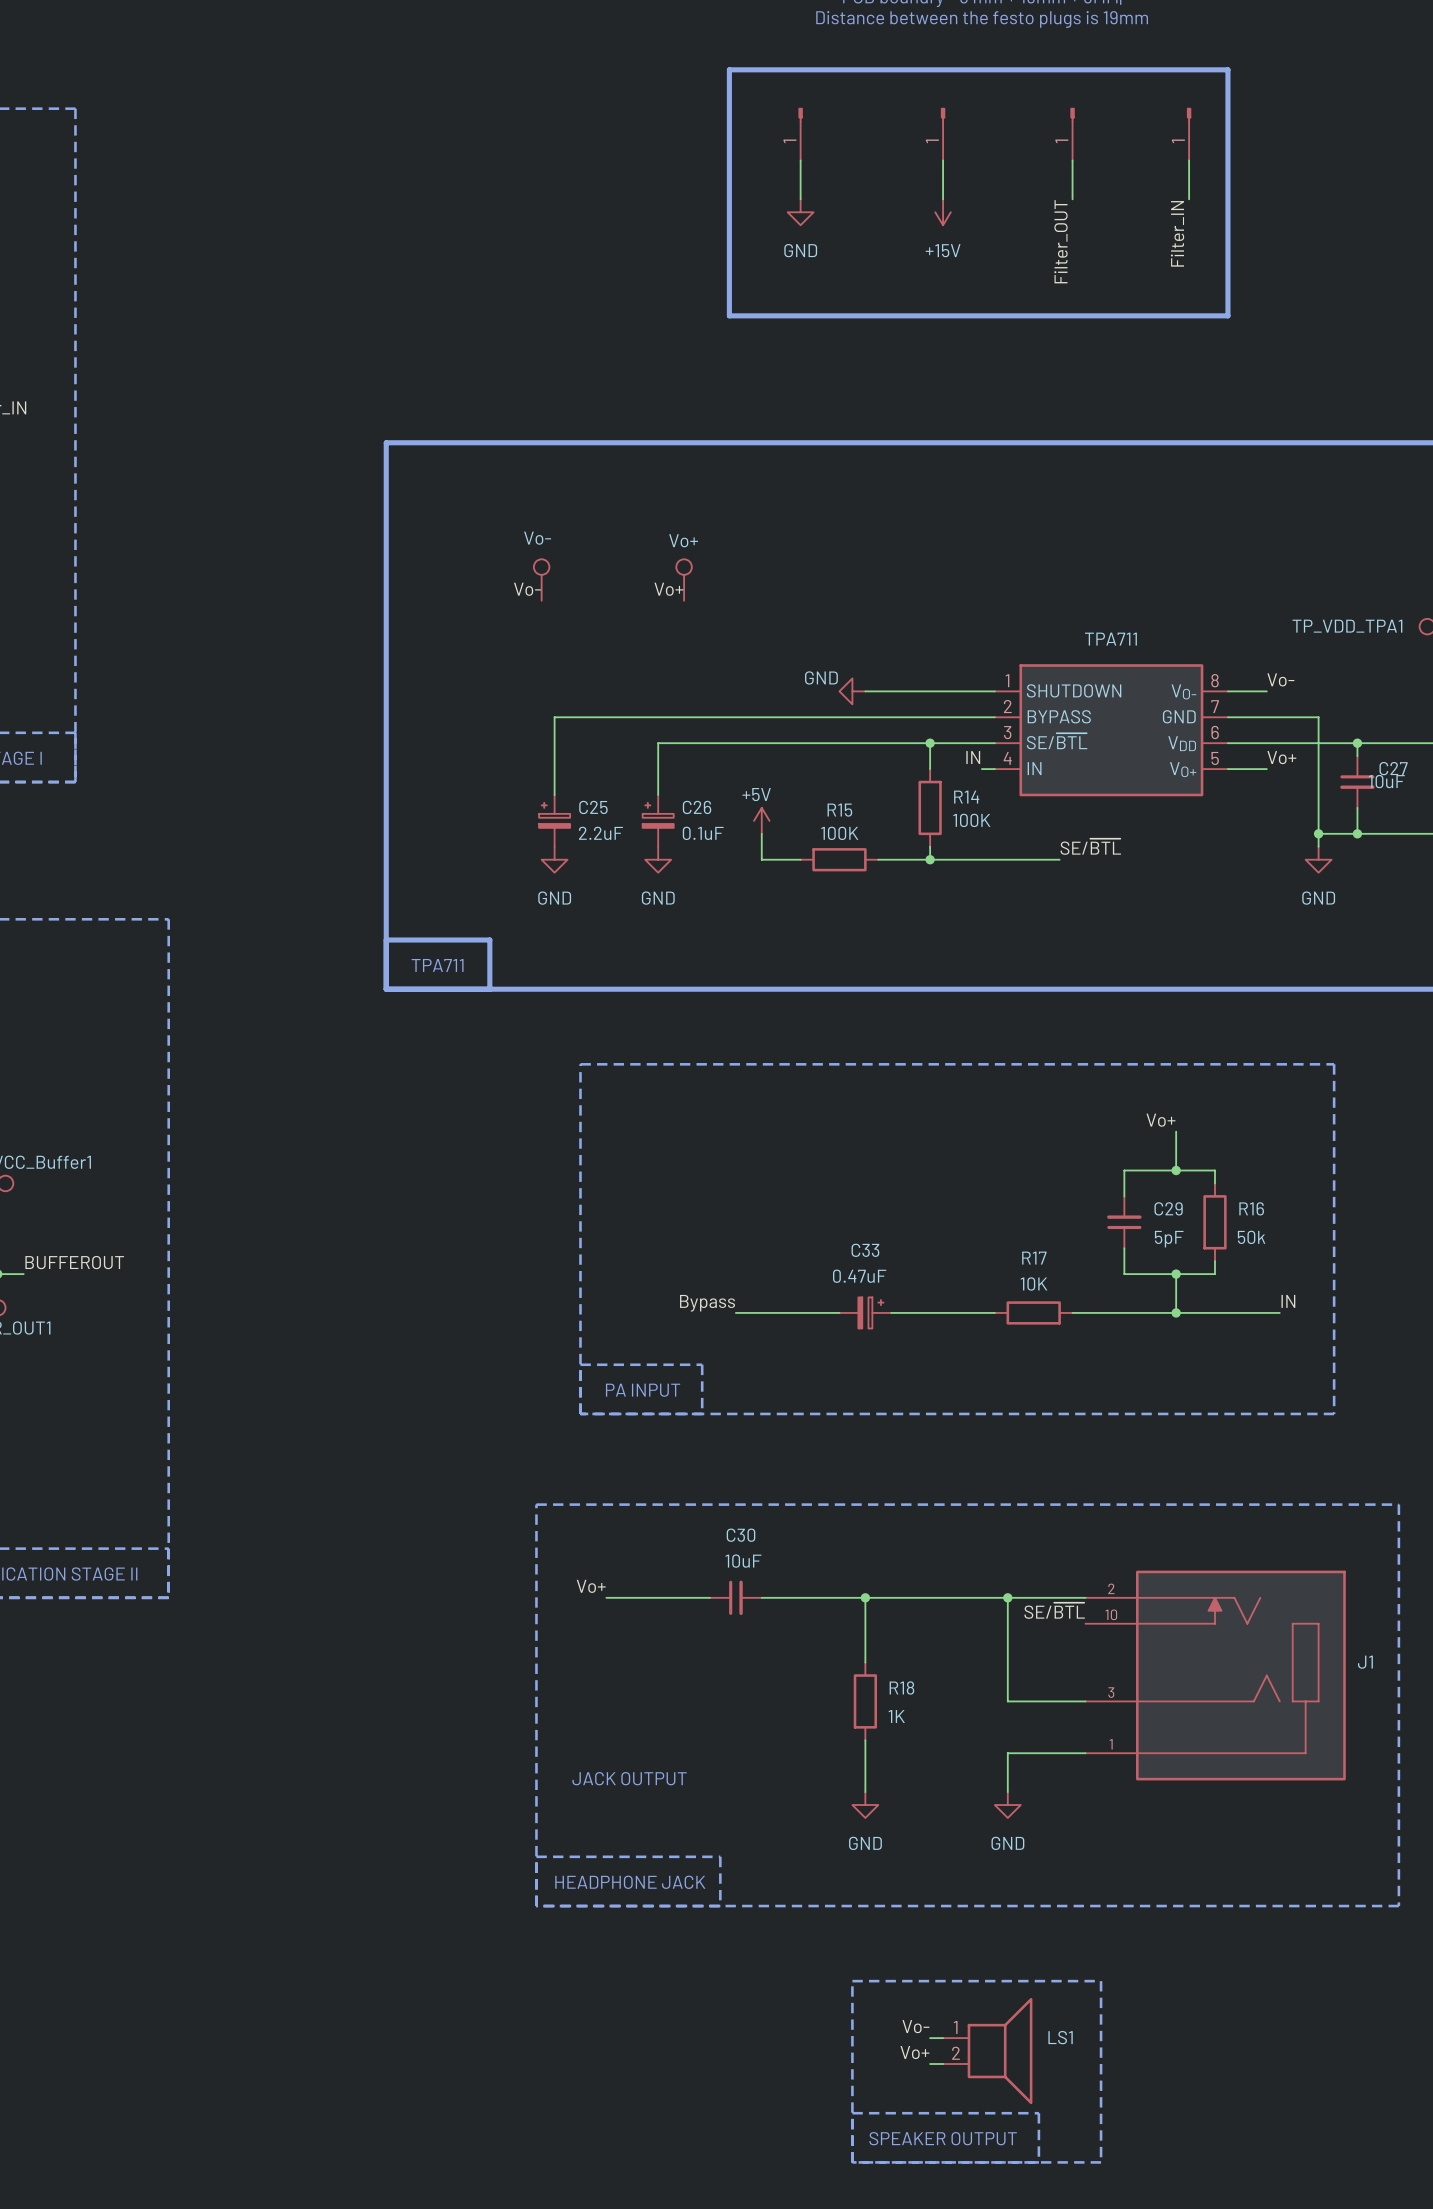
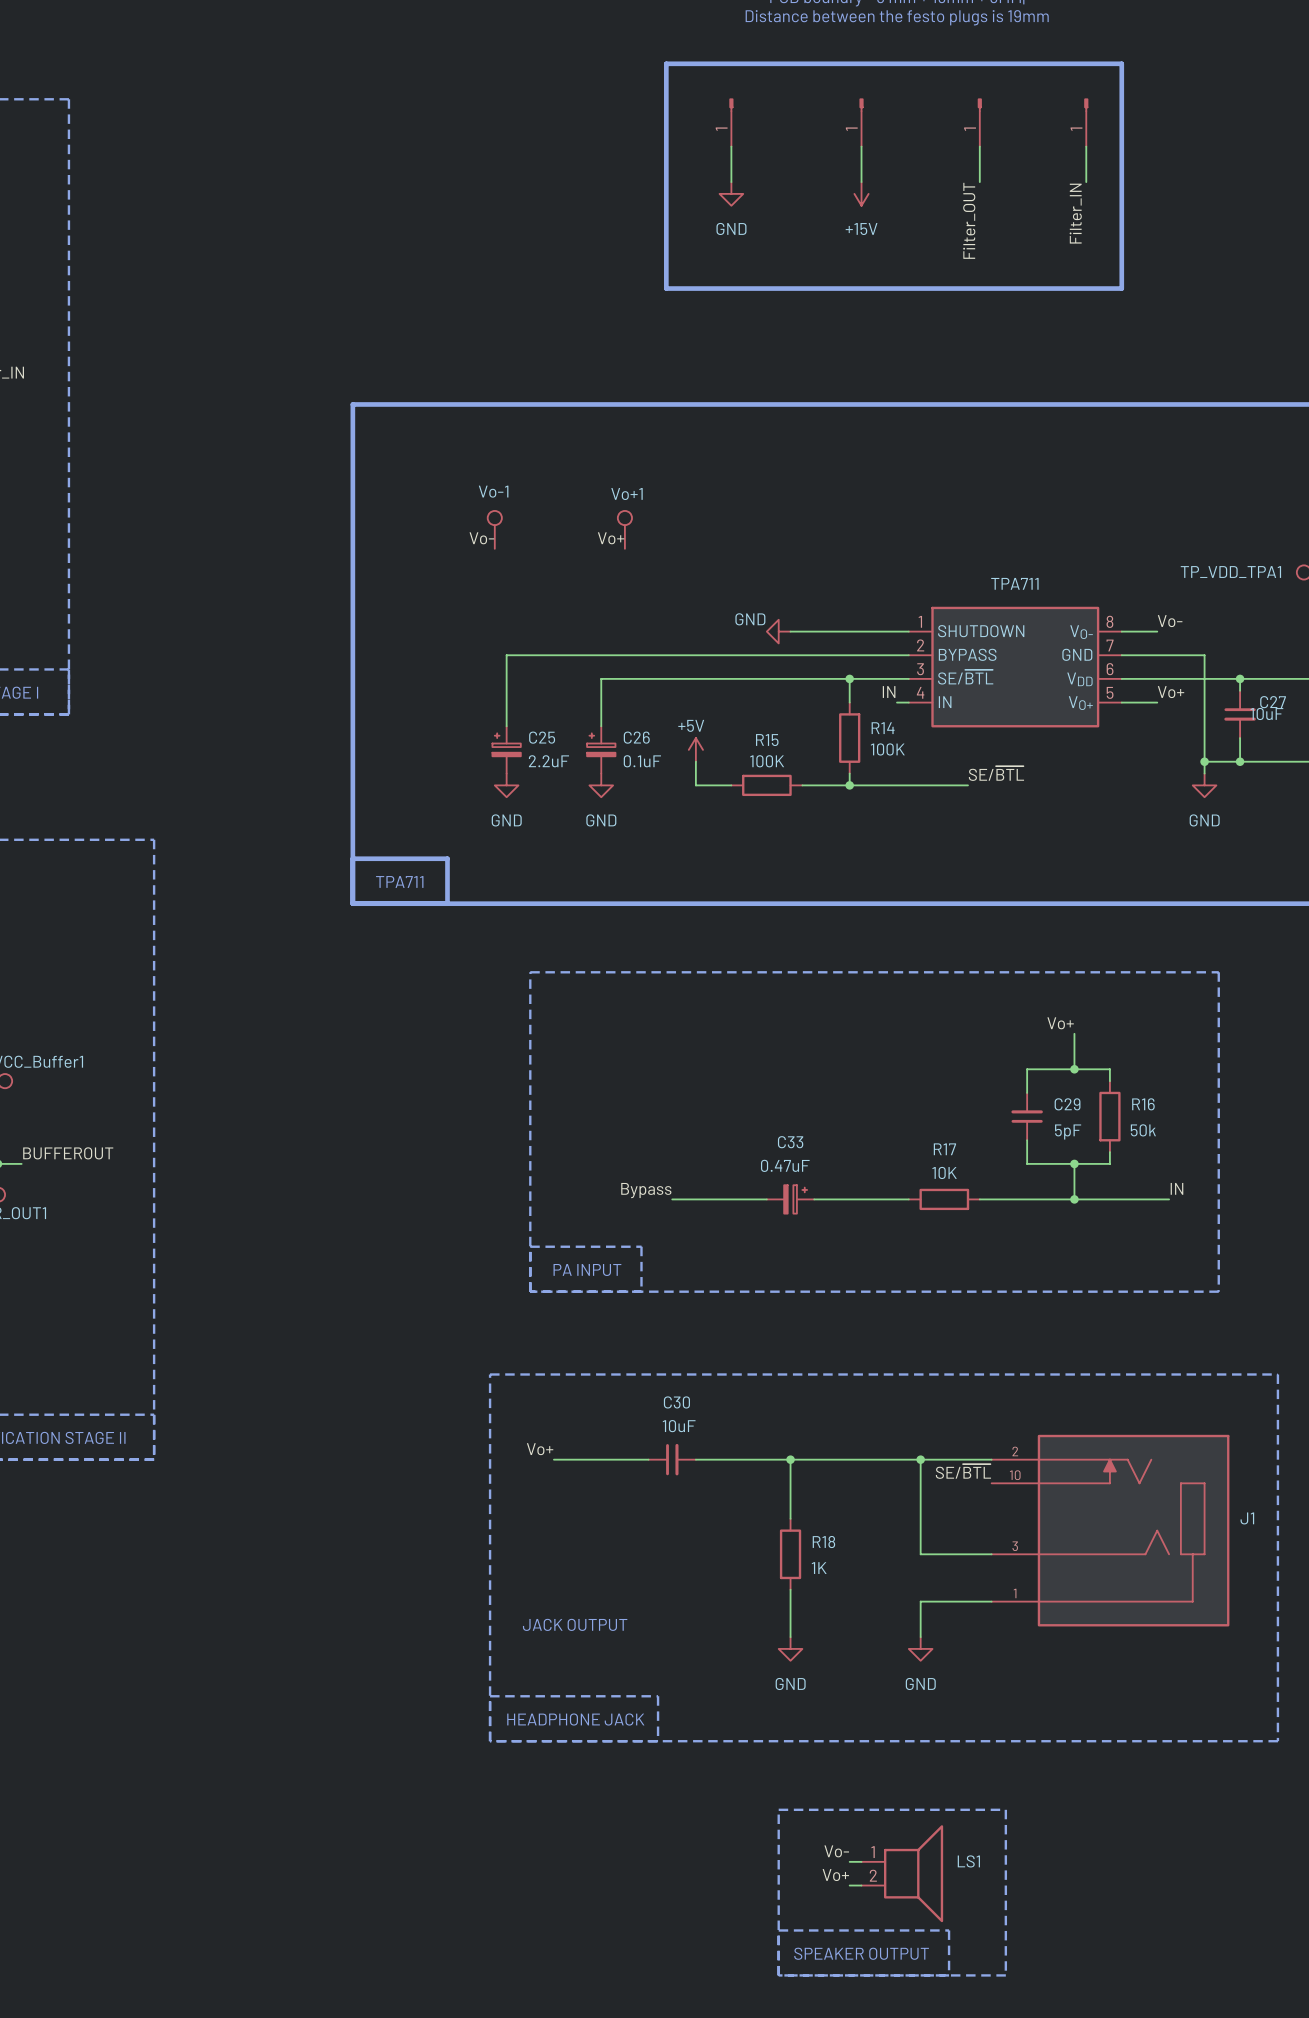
Vo- name: Vo- (537, 538) -> Vo-1 (493, 491)
Vo+ name: Vo+ (683, 540) -> Vo+1 (627, 494)

